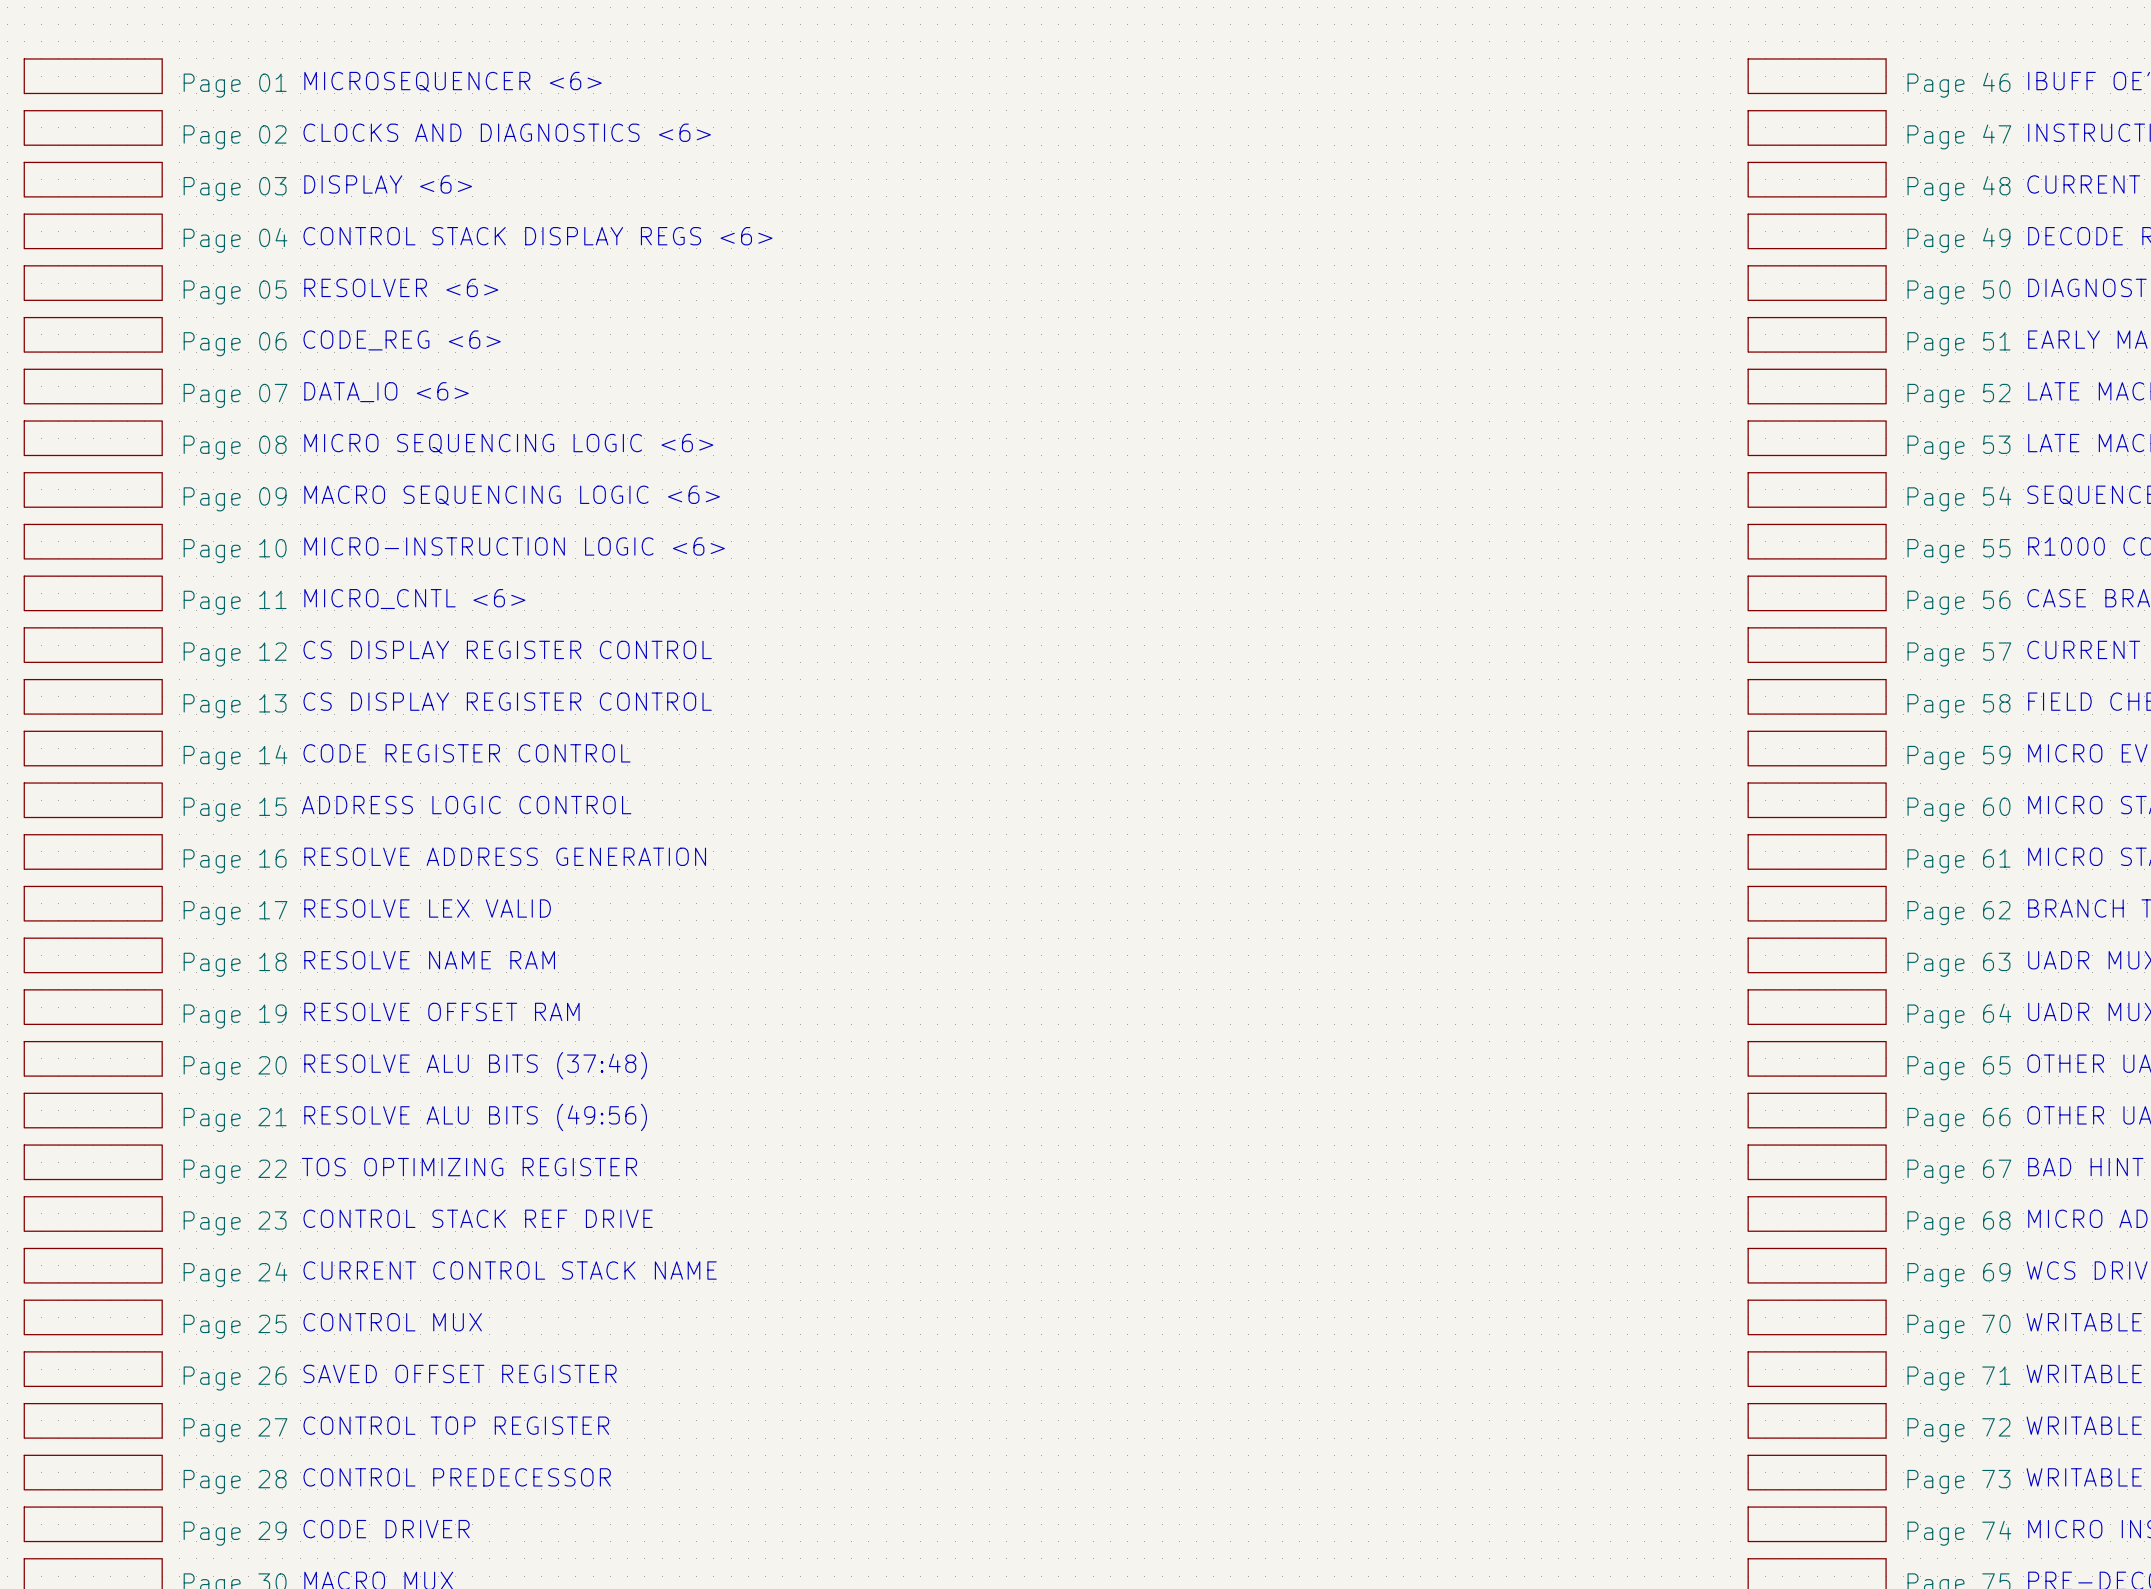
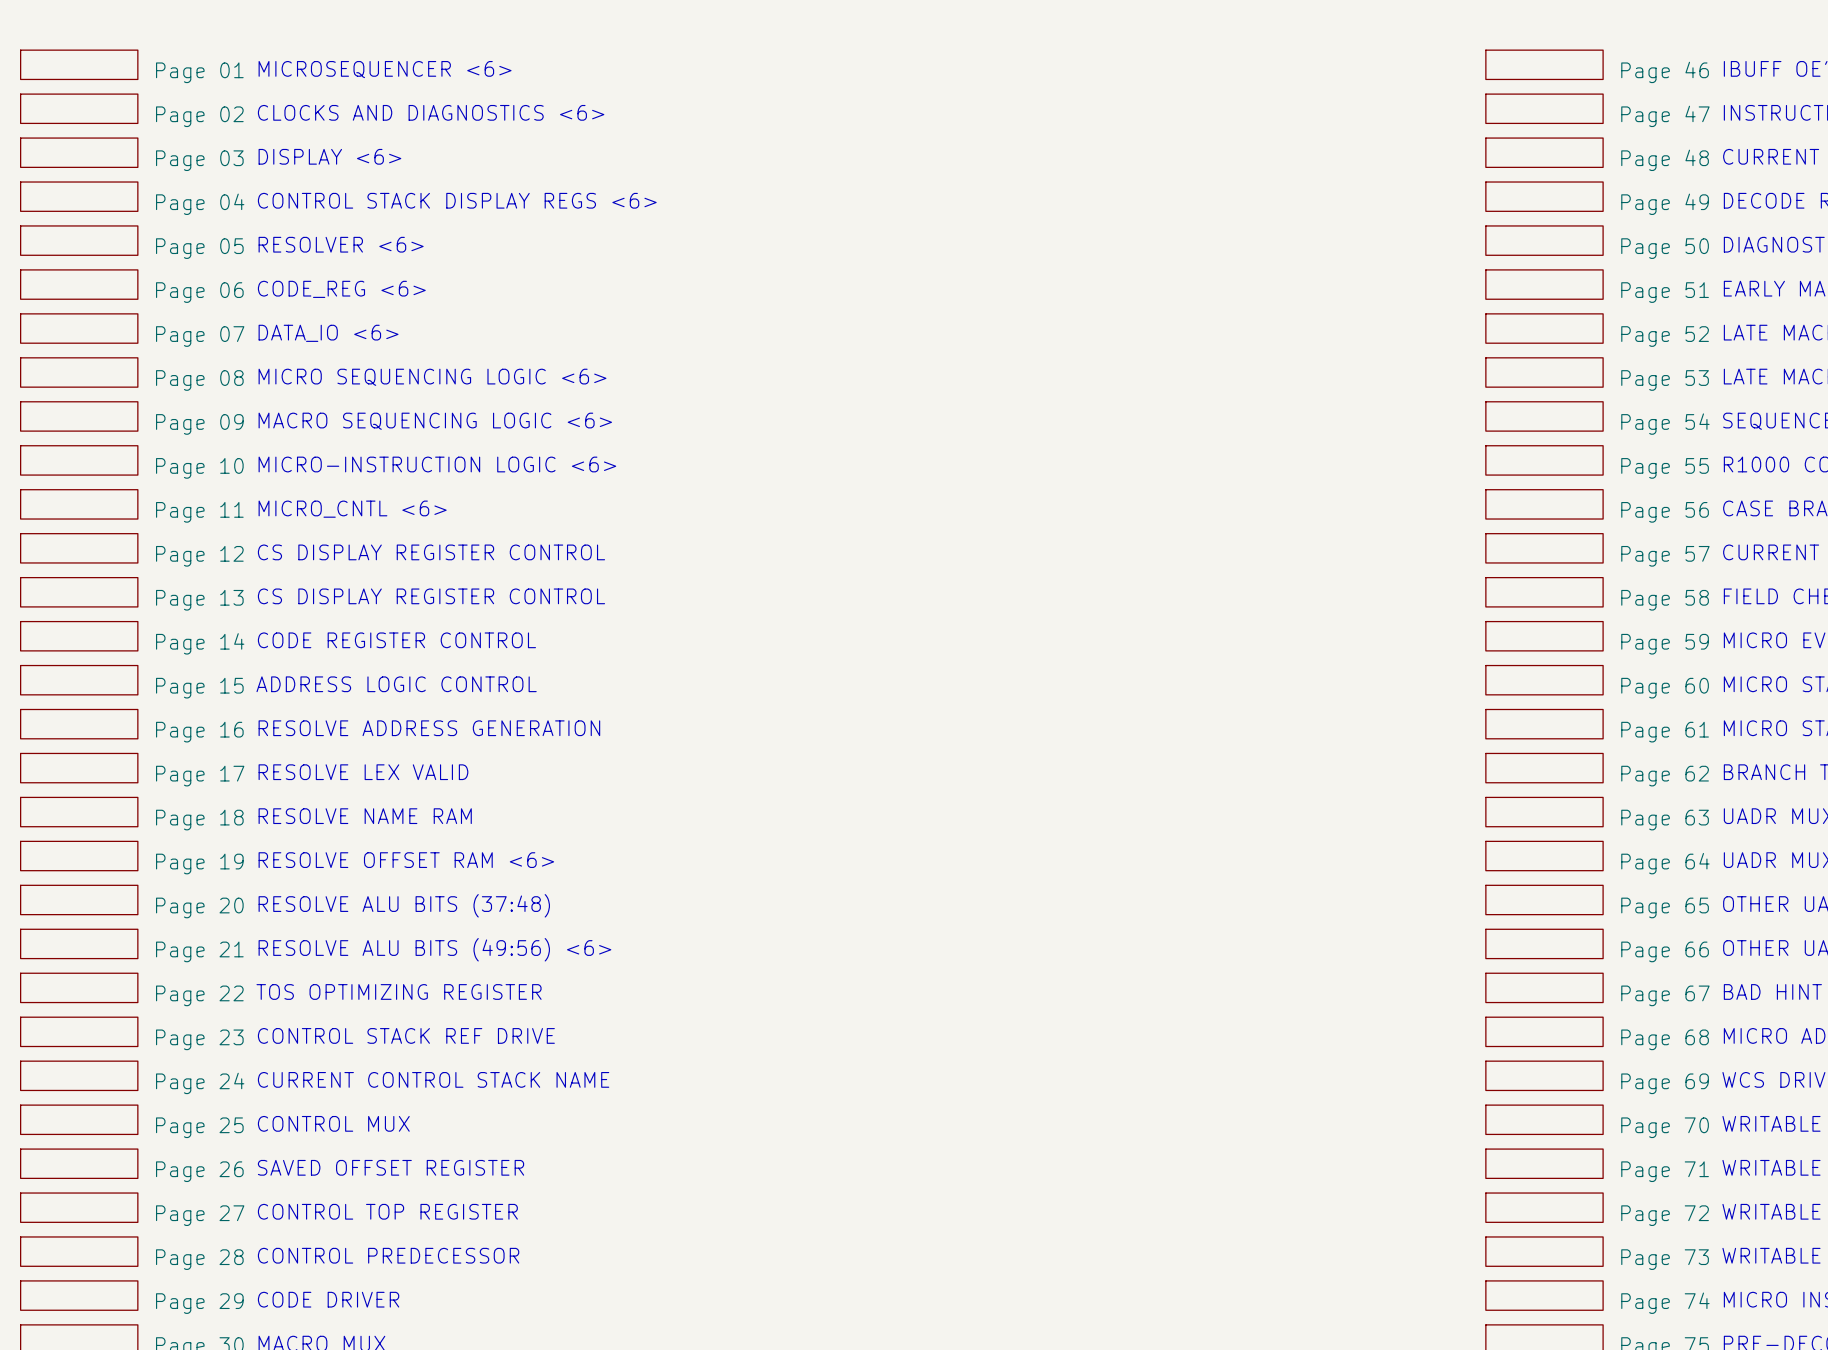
text: RESOLVE OFFSET RAM (441, 1011) -> RESOLVE OFFSET RAM <6> (406, 860)
text: RESOLVE ALU BITS (49:56) (475, 1117) -> RESOLVE ALU BITS (49:56) <6> (434, 949)

